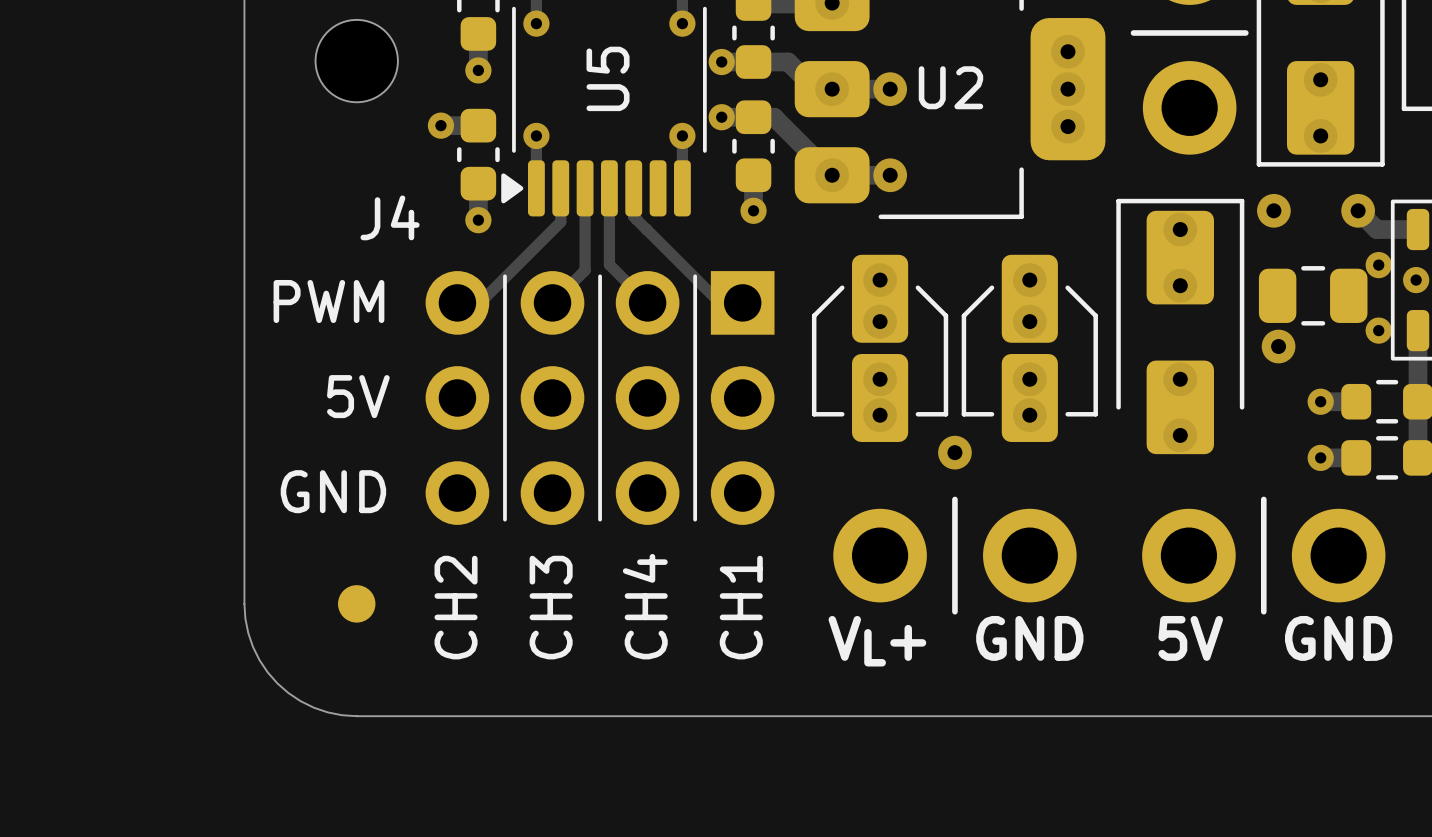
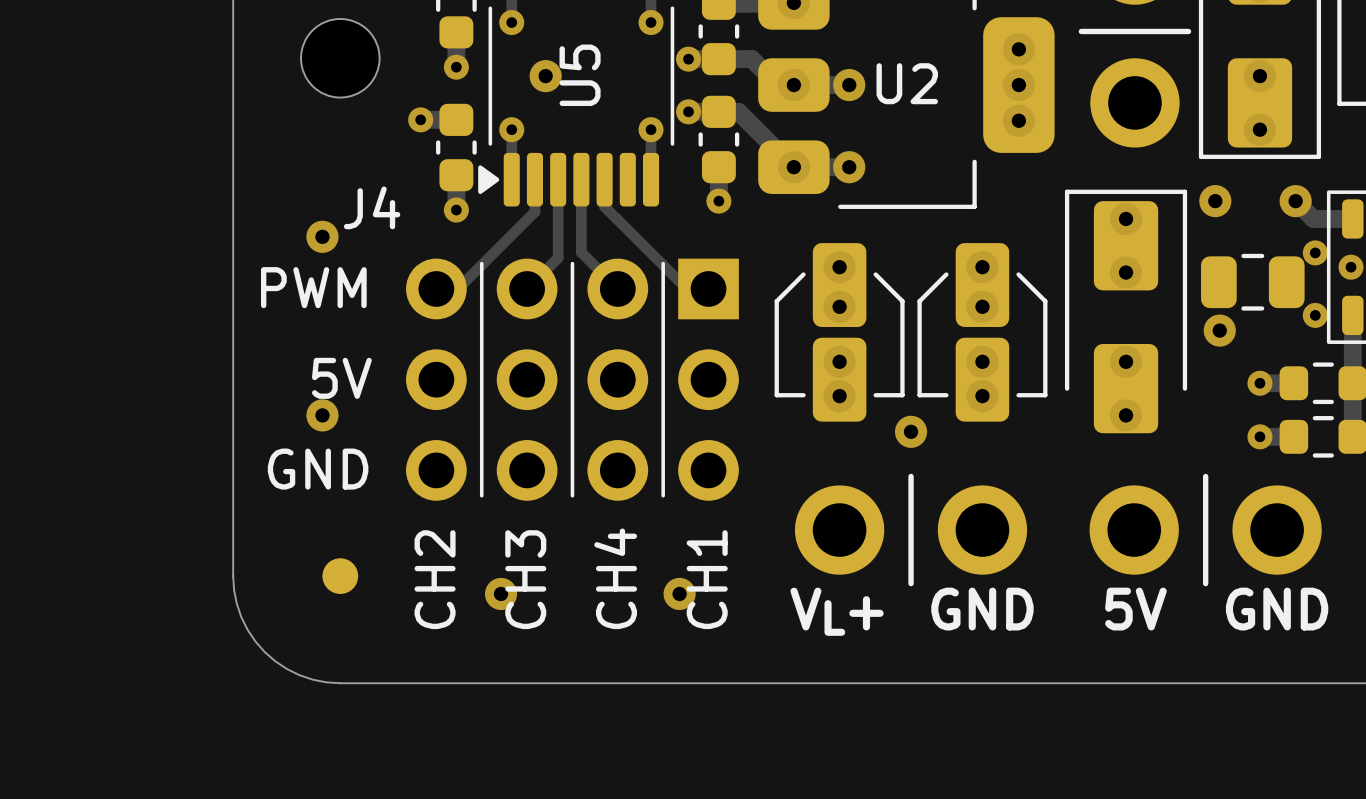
via: none -> (545, 76)
via: none -> (322, 236)
via: none -> (322, 415)
via: none -> (501, 593)
via: none -> (679, 593)

